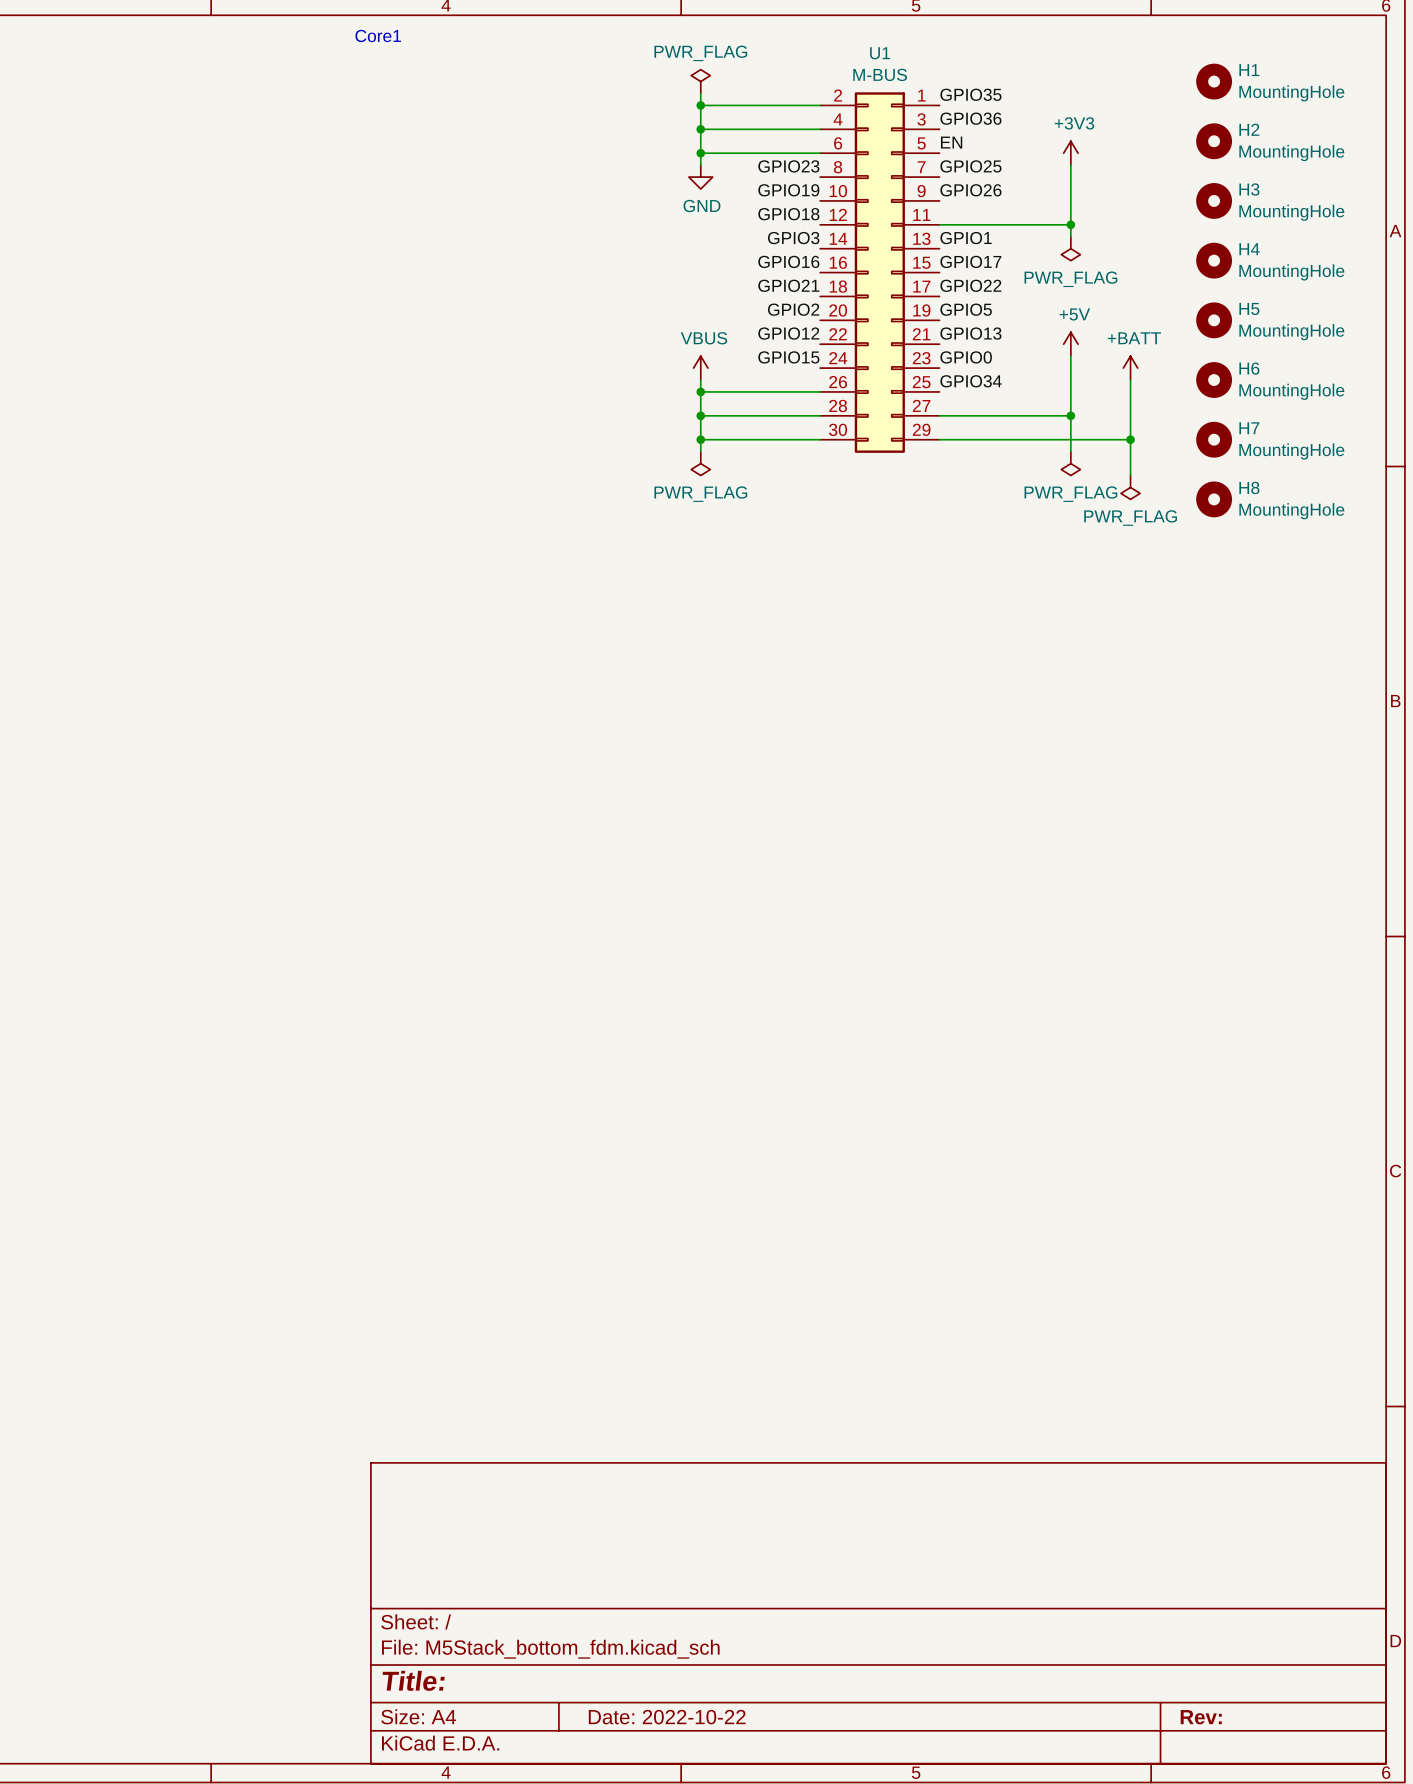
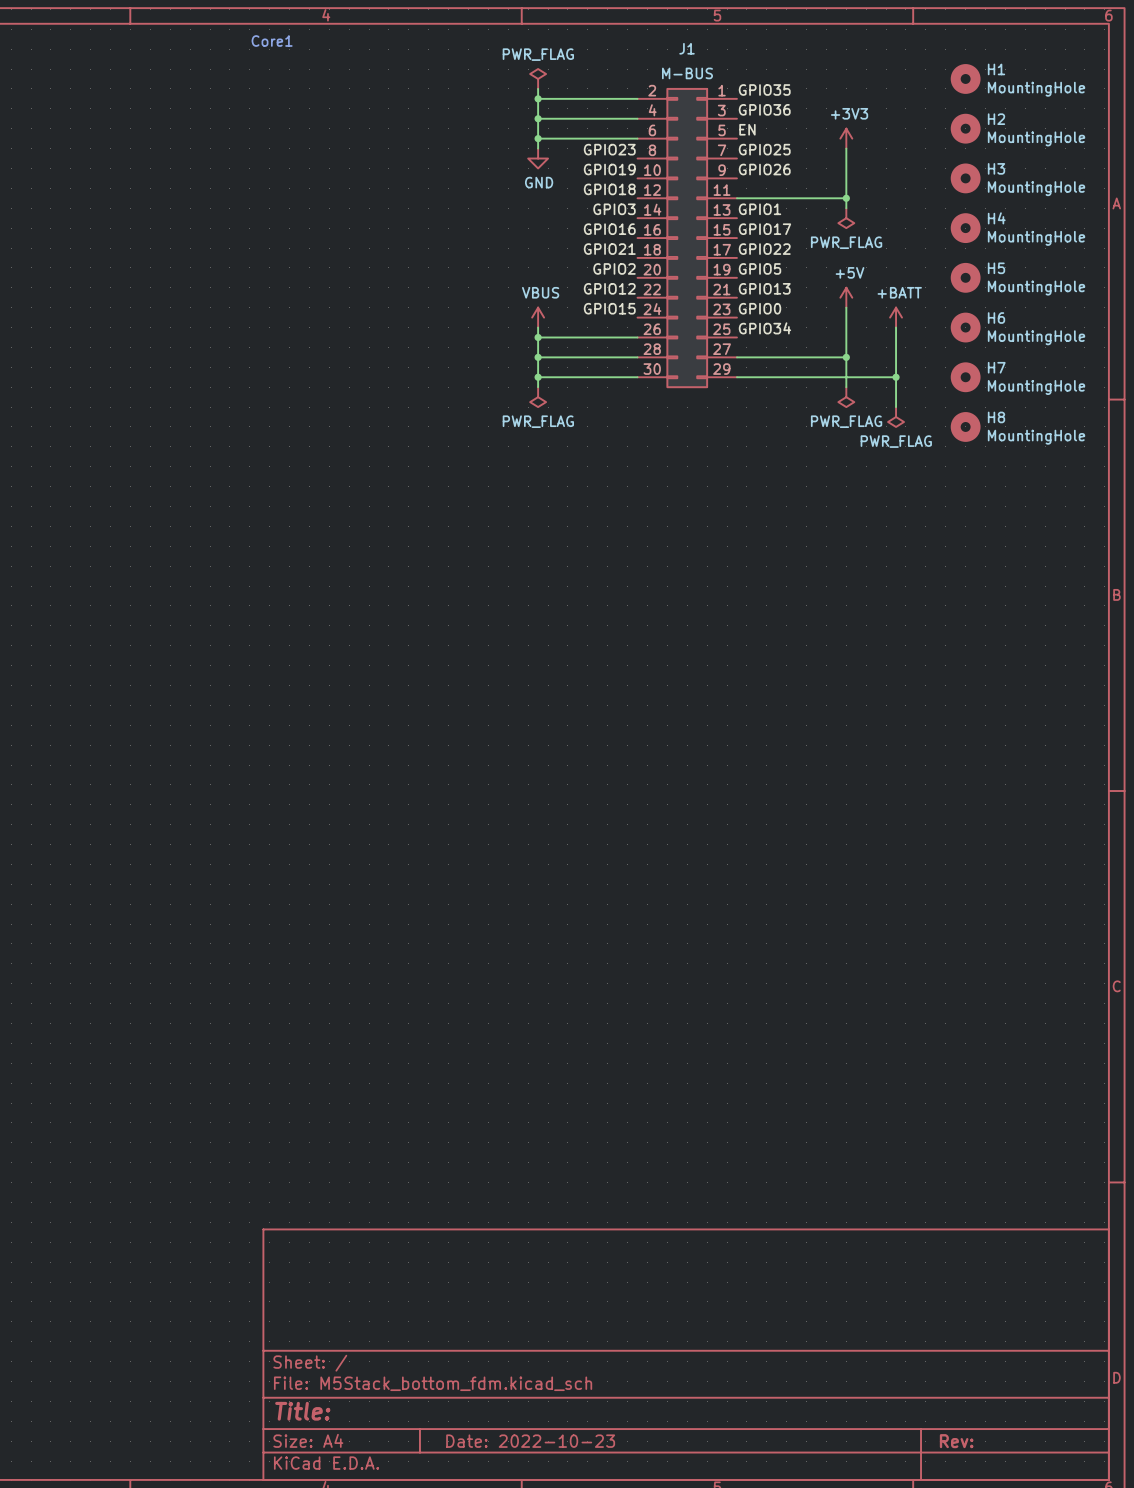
U1 name: U1 (880, 53) -> J1 (687, 48)
title block: Date: 2022-10-22 (667, 1717) -> Date: 2022-10-23 (530, 1441)

